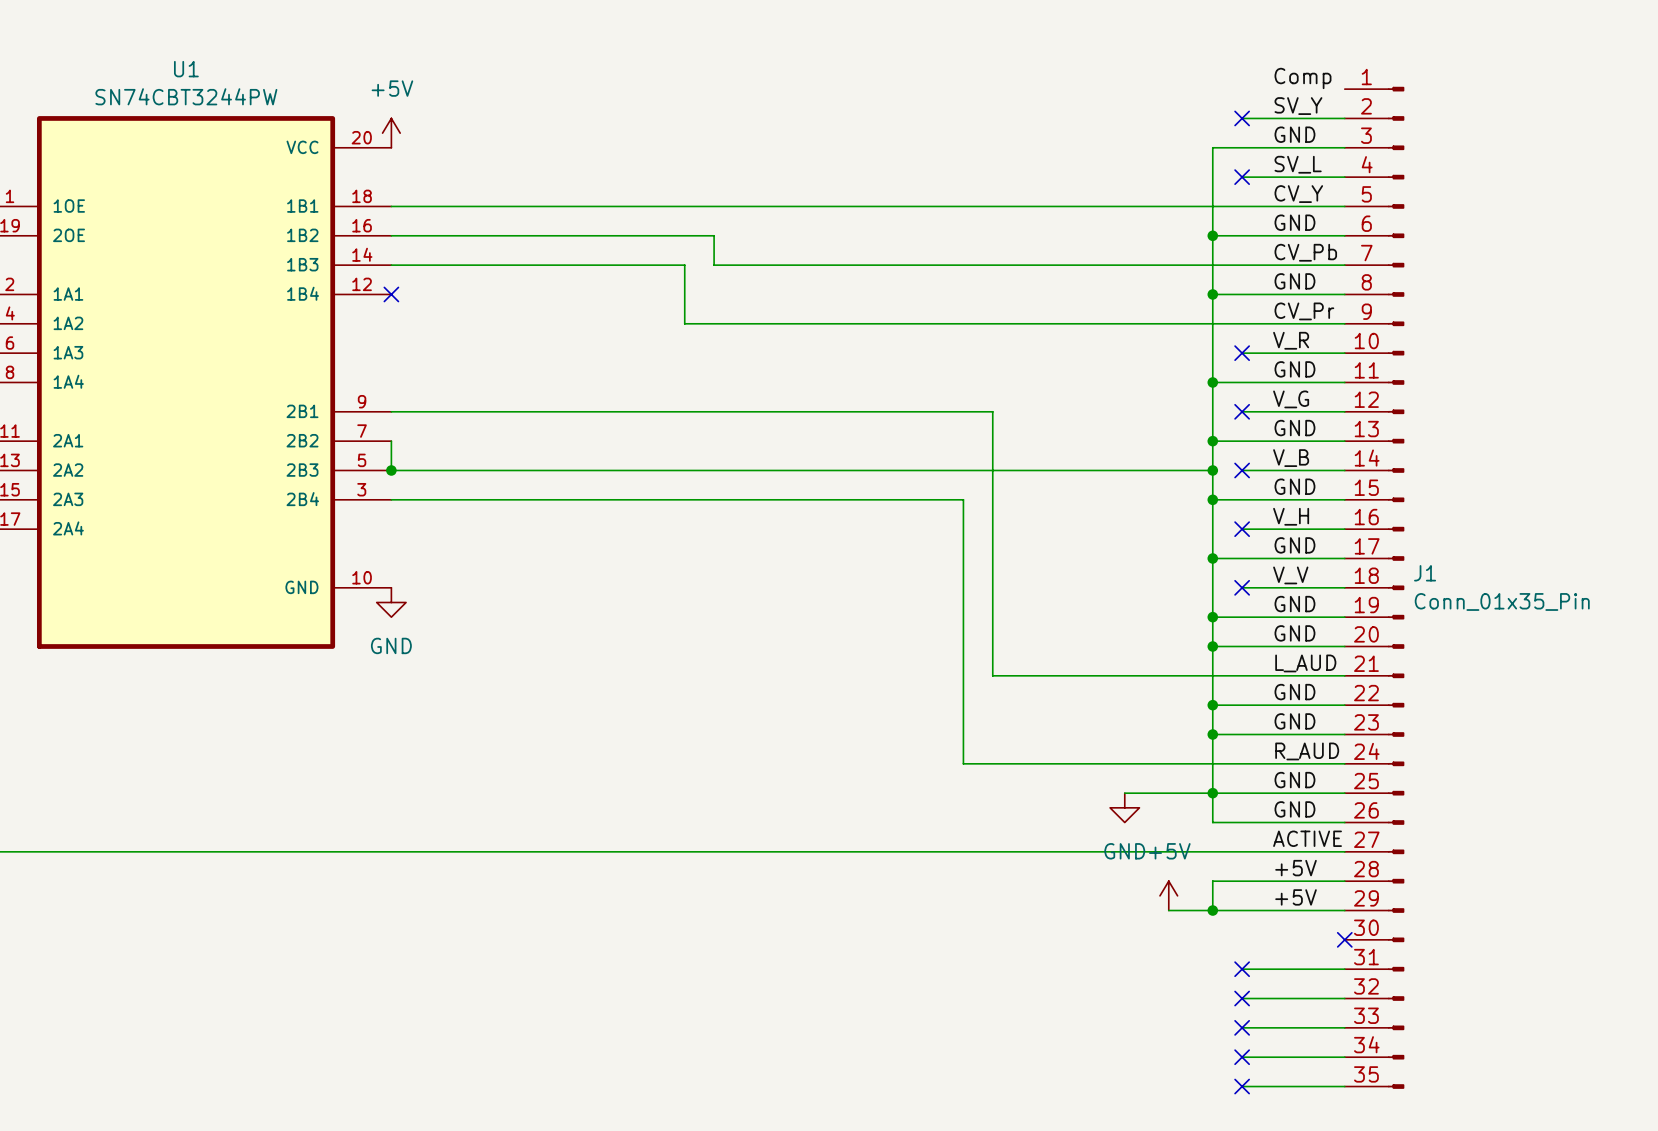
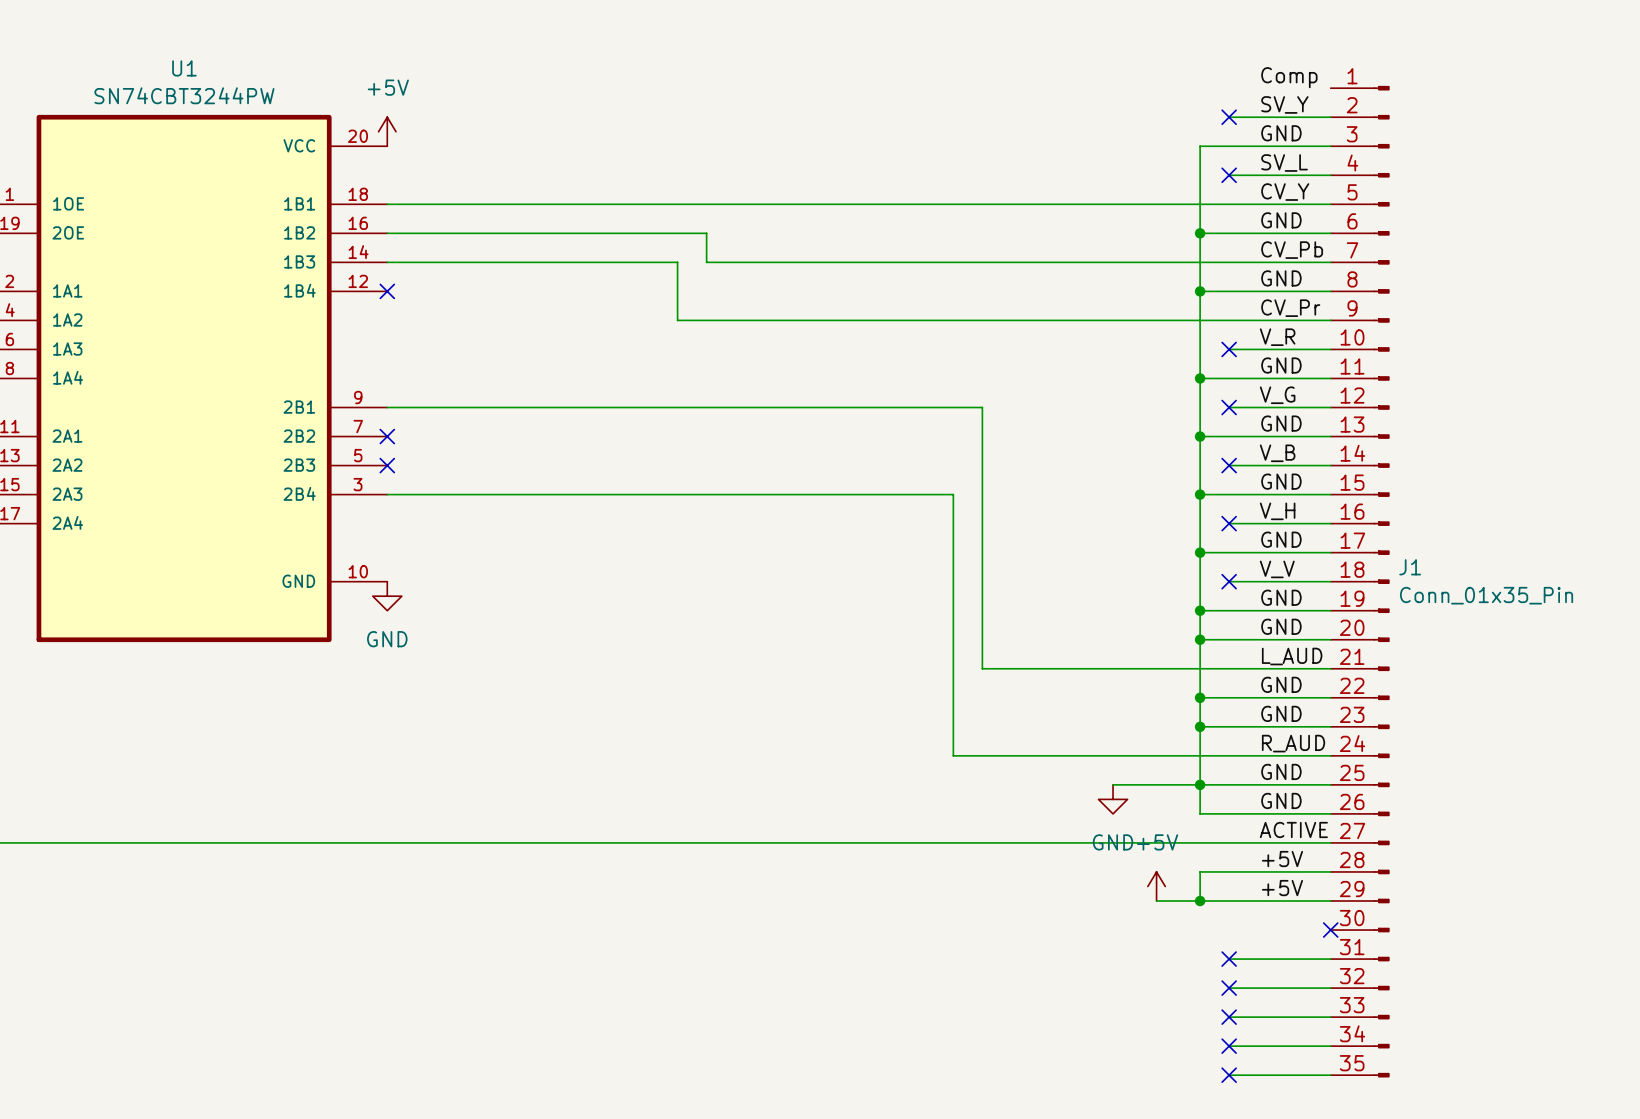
wire: (391, 441) (391, 470) (1212, 470) -> none
no-connect mark: none -> (387, 436)
junction: (391, 470) -> none
no-connect mark: none -> (387, 465)
junction: (1212, 470) -> none

